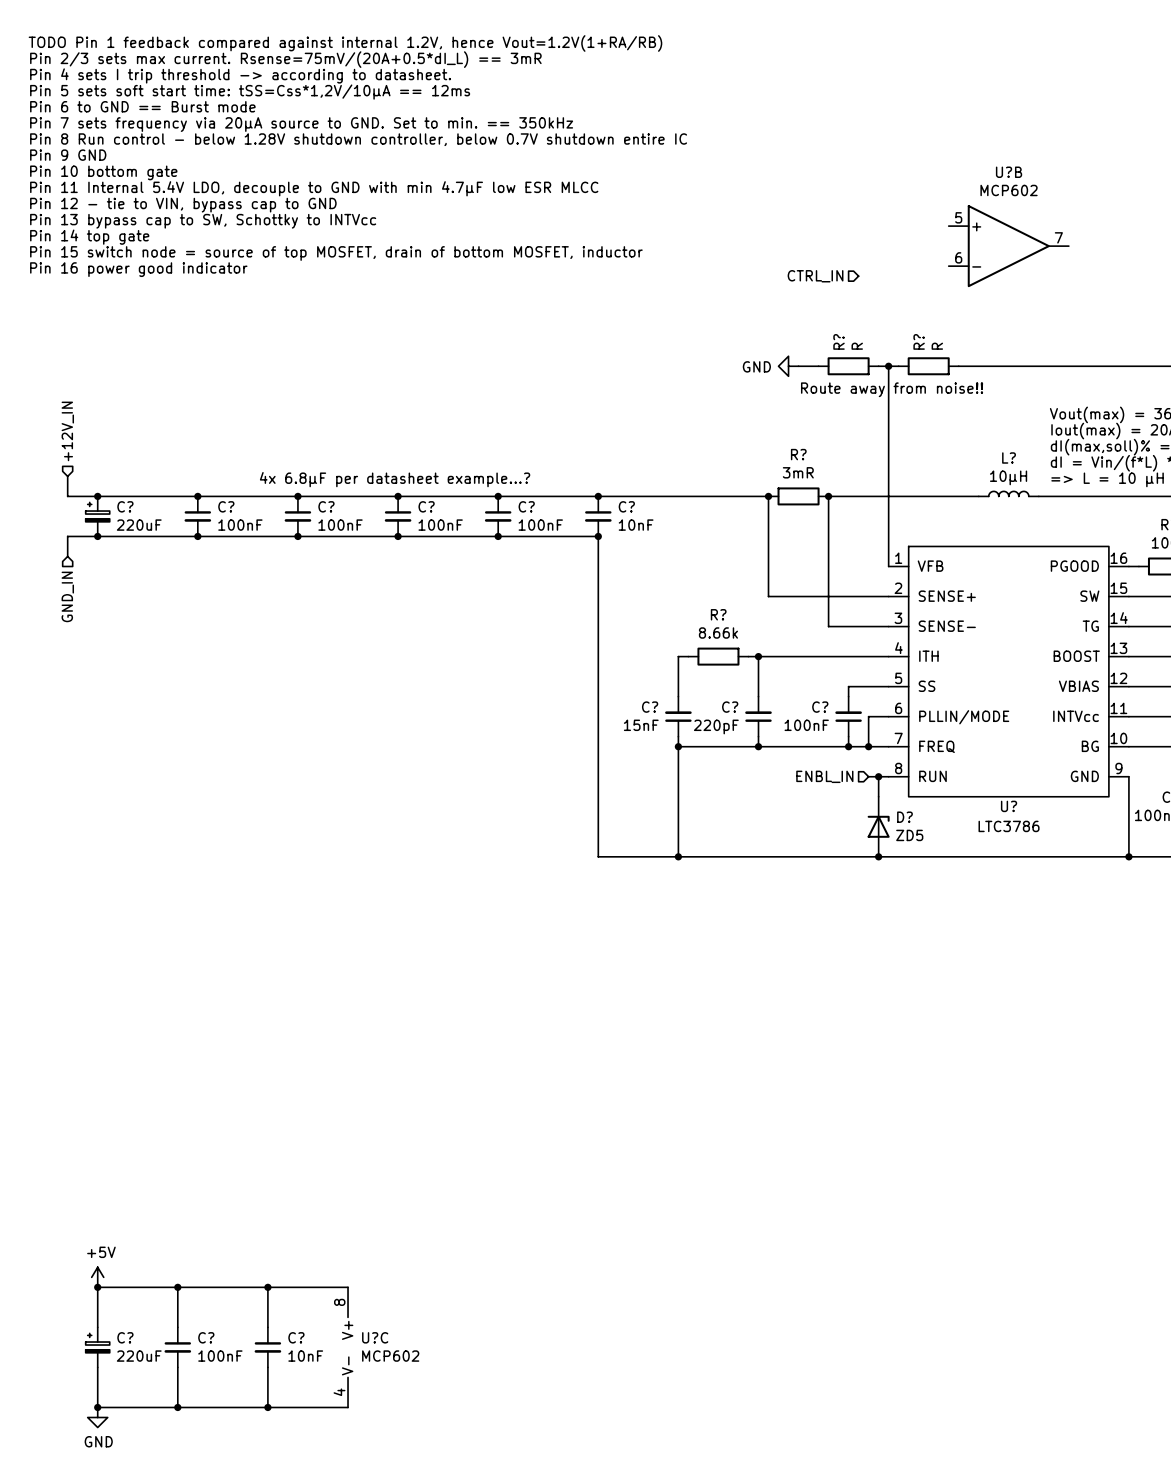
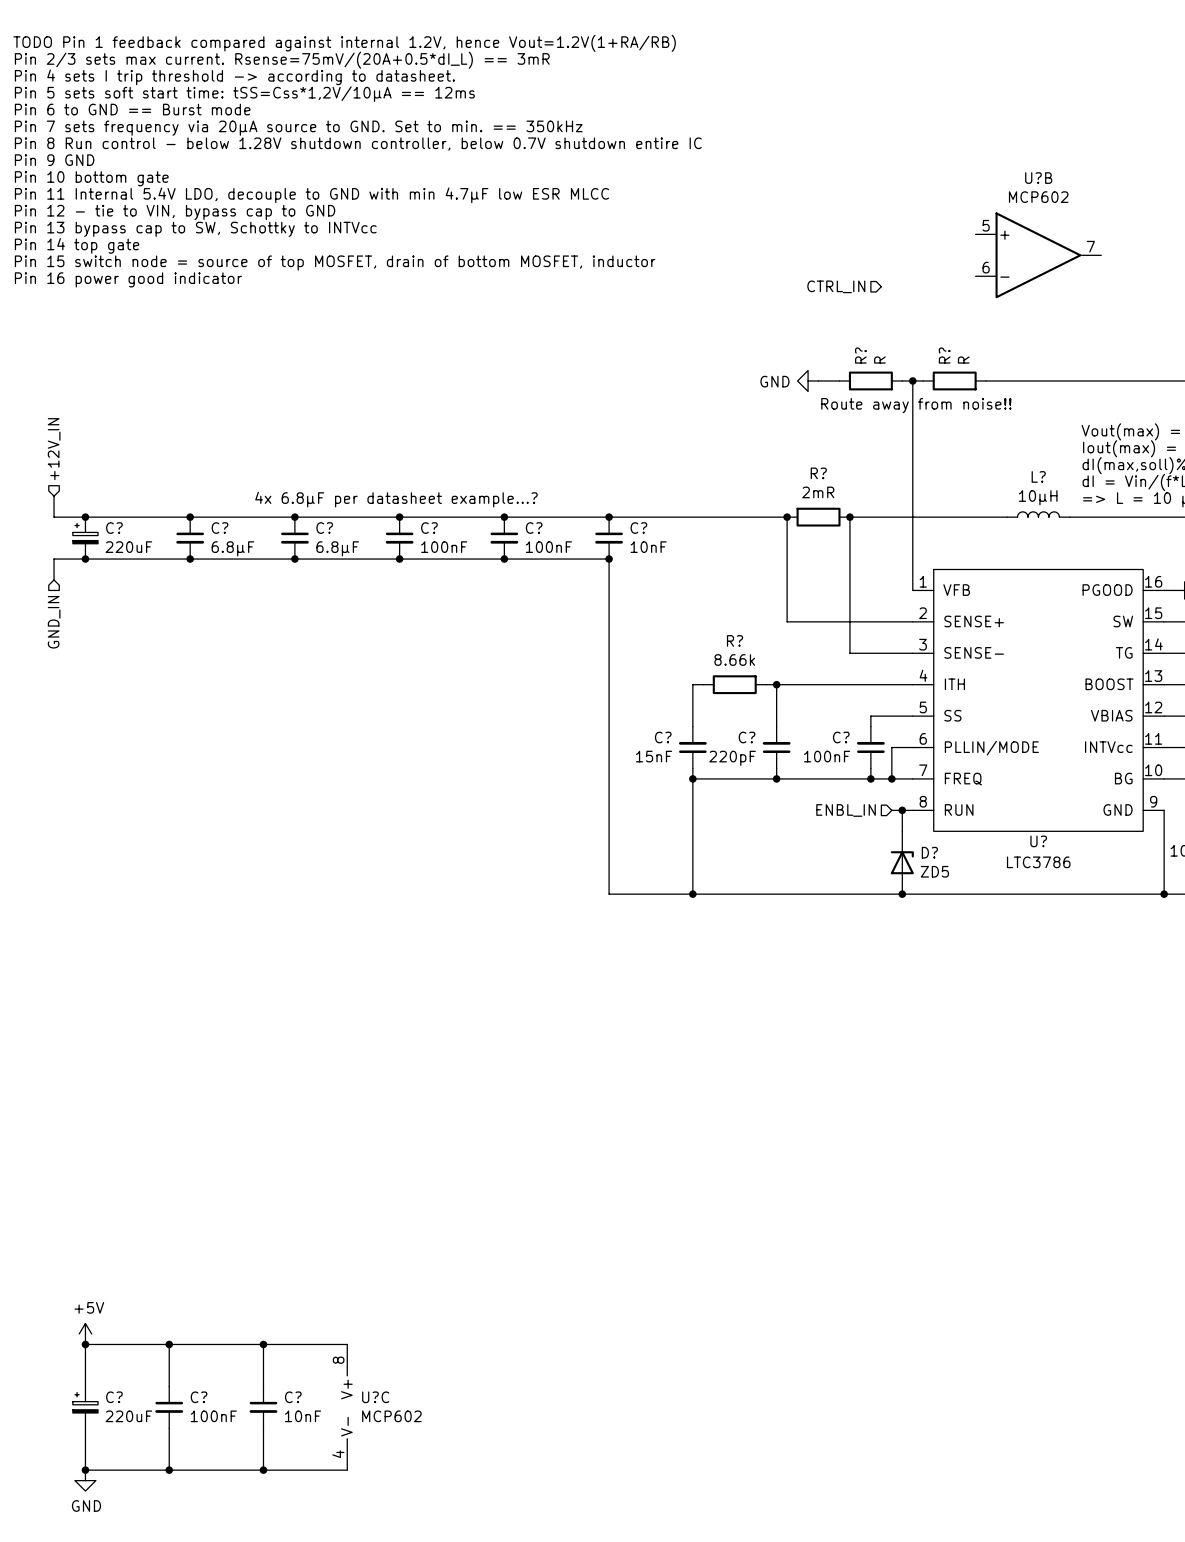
R? value: 3mR (798, 472) -> 2mR (818, 492)
C? value: 100nF (240, 525) -> 6.8µF (232, 548)
C? value: 100nF (340, 525) -> 6.8µF (337, 548)

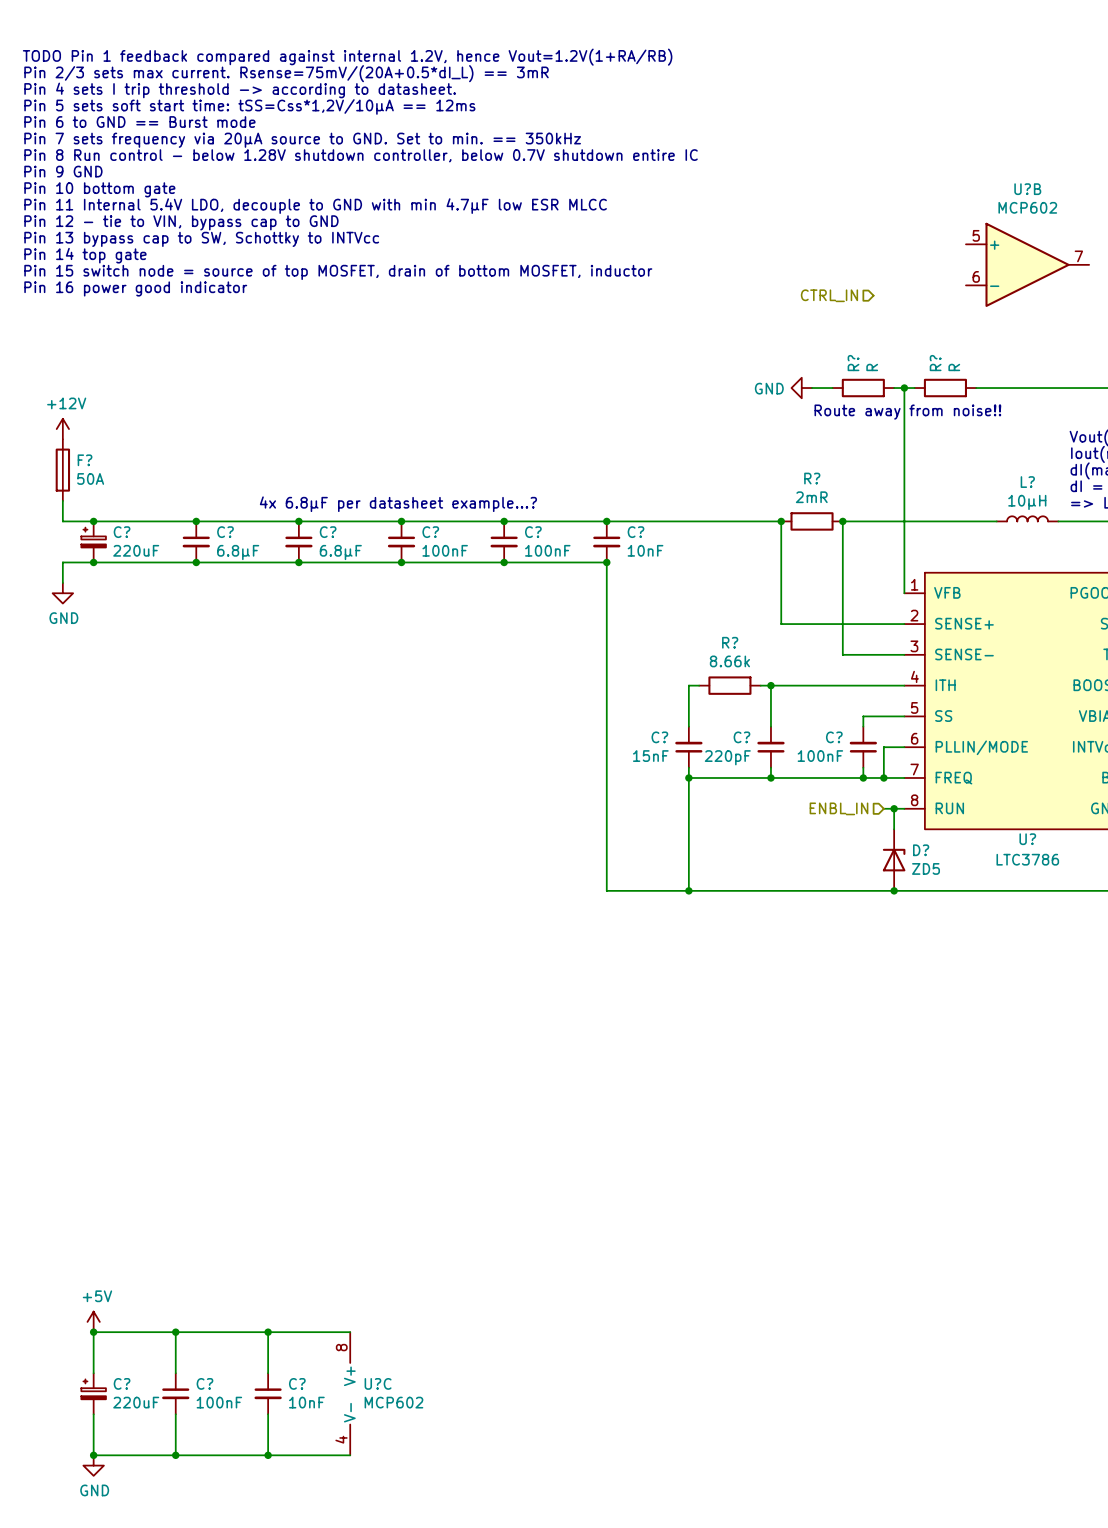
power symbol: none -> +12V (62, 429)
hierarchical label: +12V_IN (54, 449) -> none
F?: none -> 50A (62, 470)
power symbol: none -> GND (62, 593)
hierarchical label: GND_IN (54, 622) -> none

